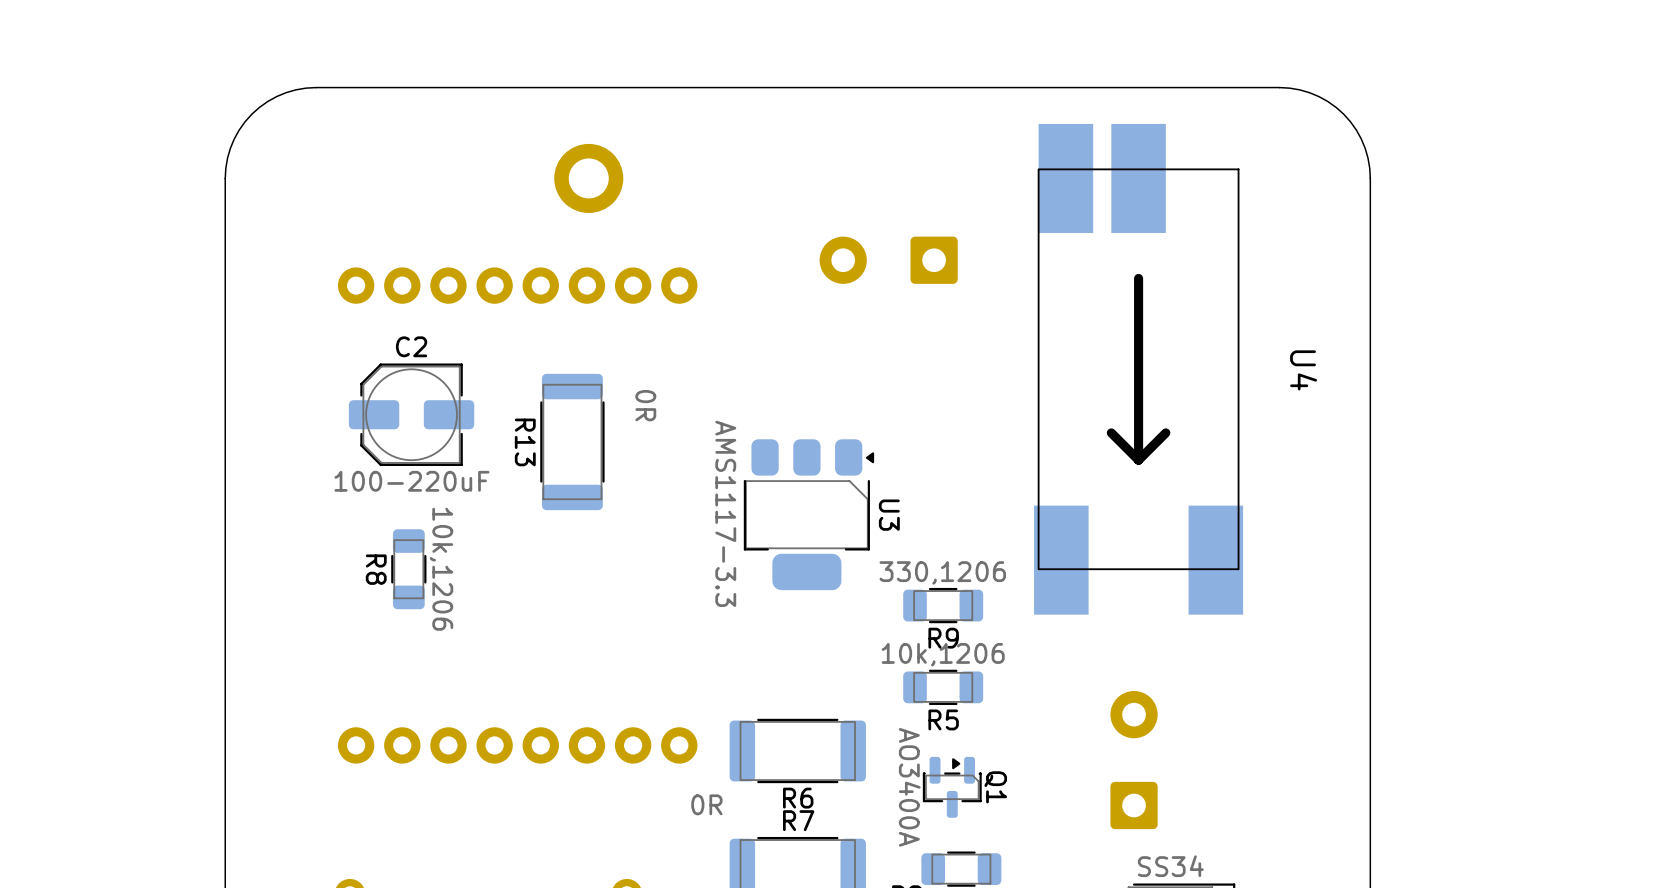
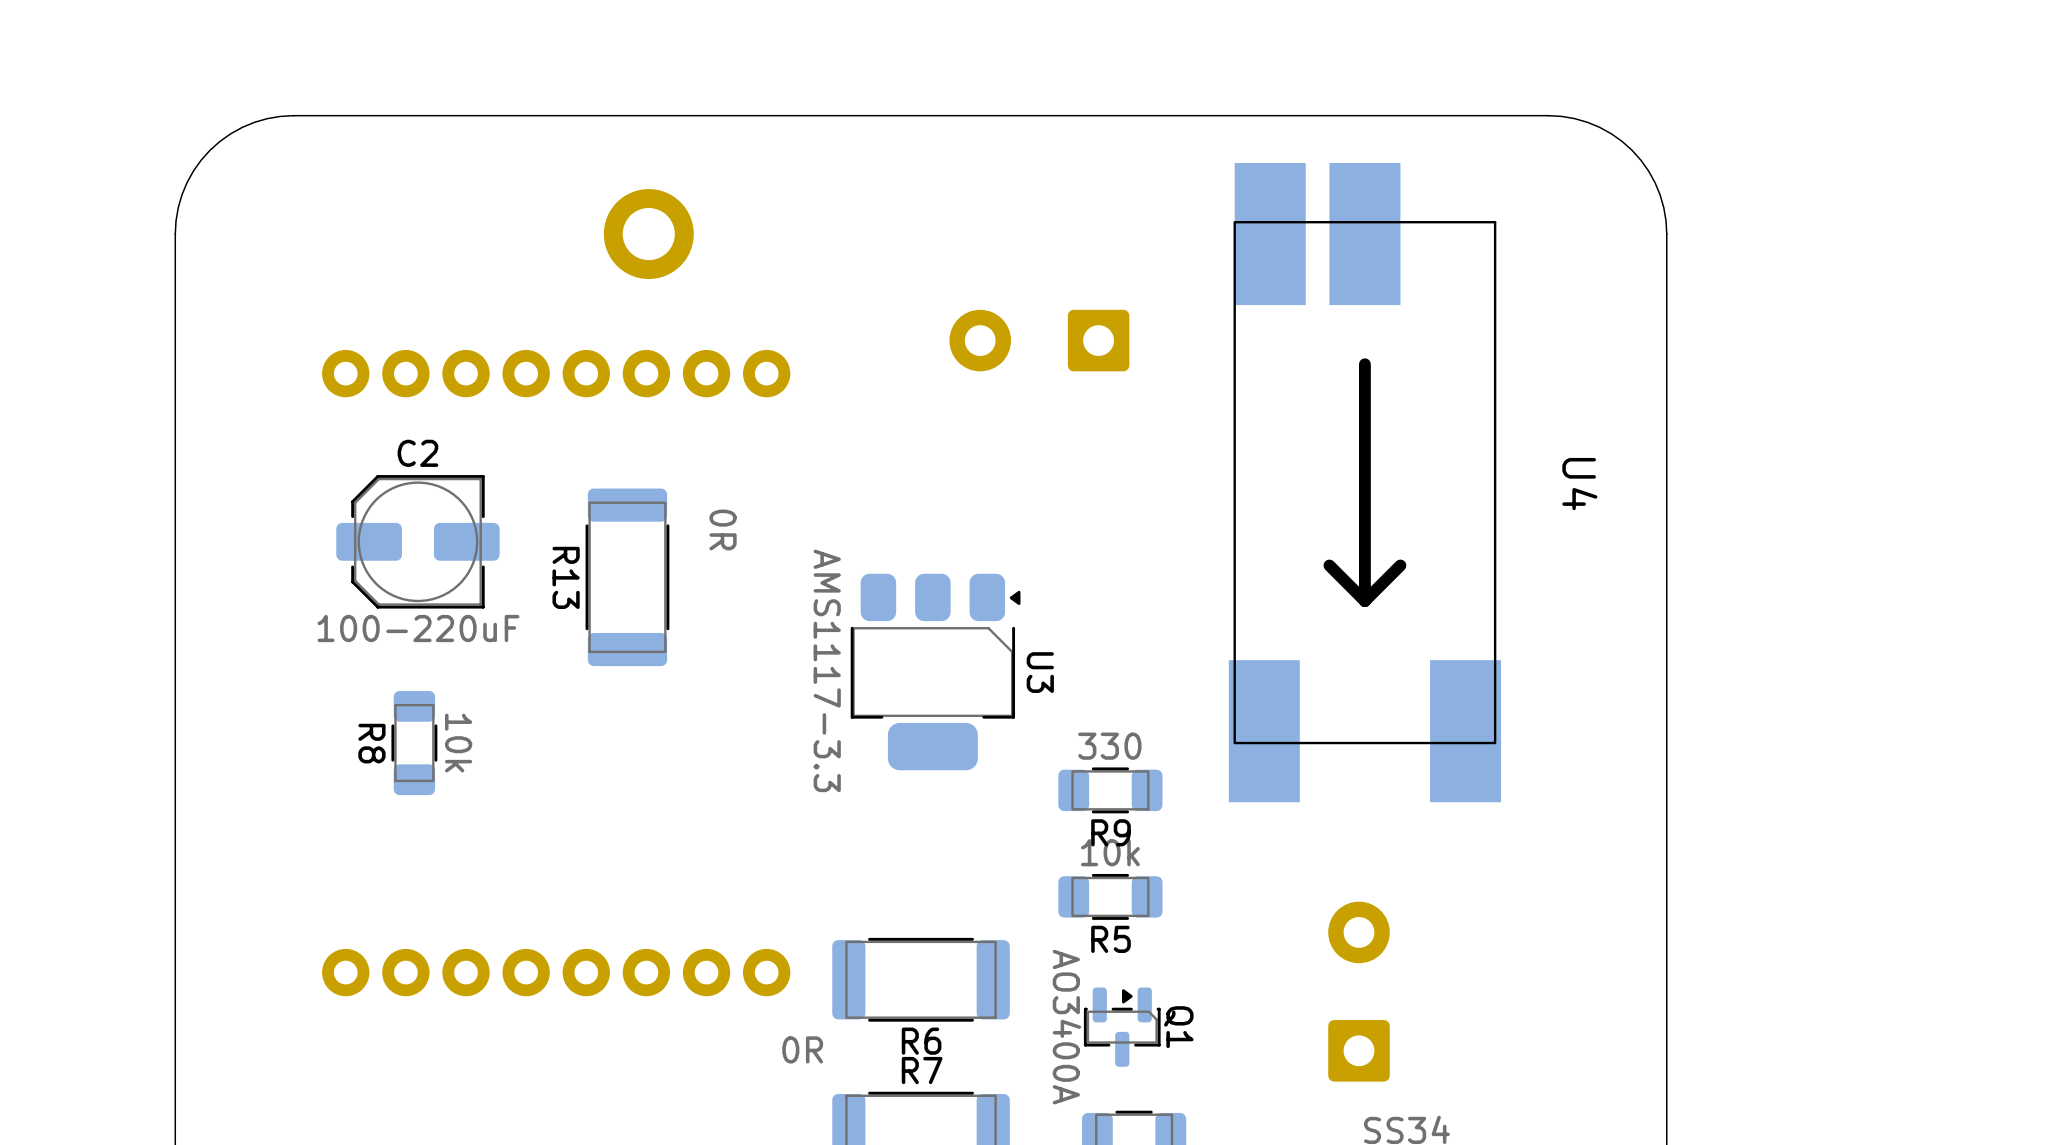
R8 value: 10k,1206 (441, 569) -> 10k (458, 743)
R9 value: 330,1206 (942, 572) -> 330 (1109, 746)
R5 value: 10k,1206 (943, 654) -> 10k (1110, 852)

